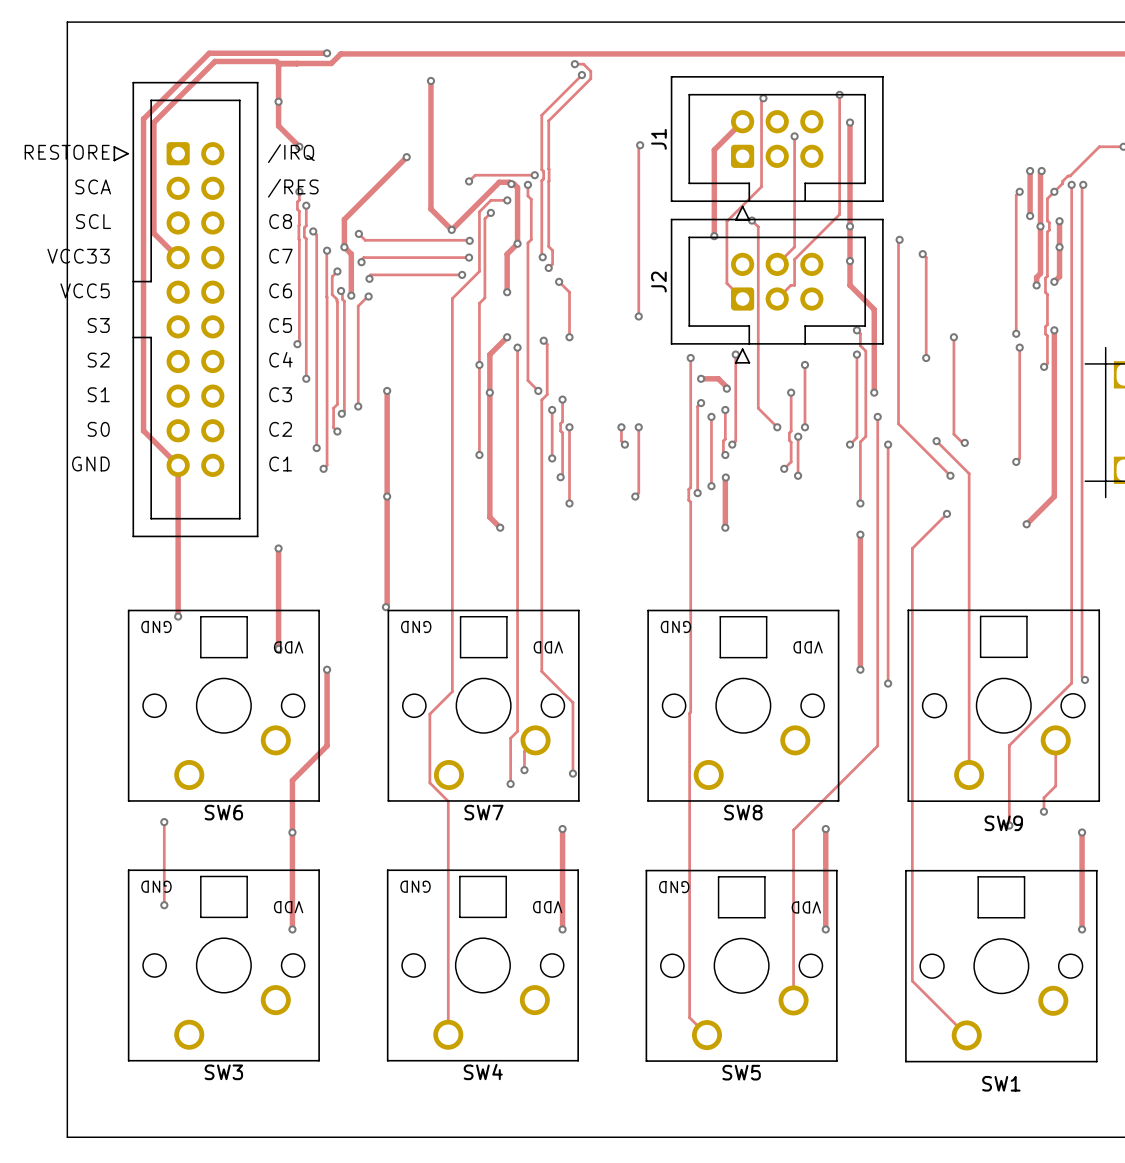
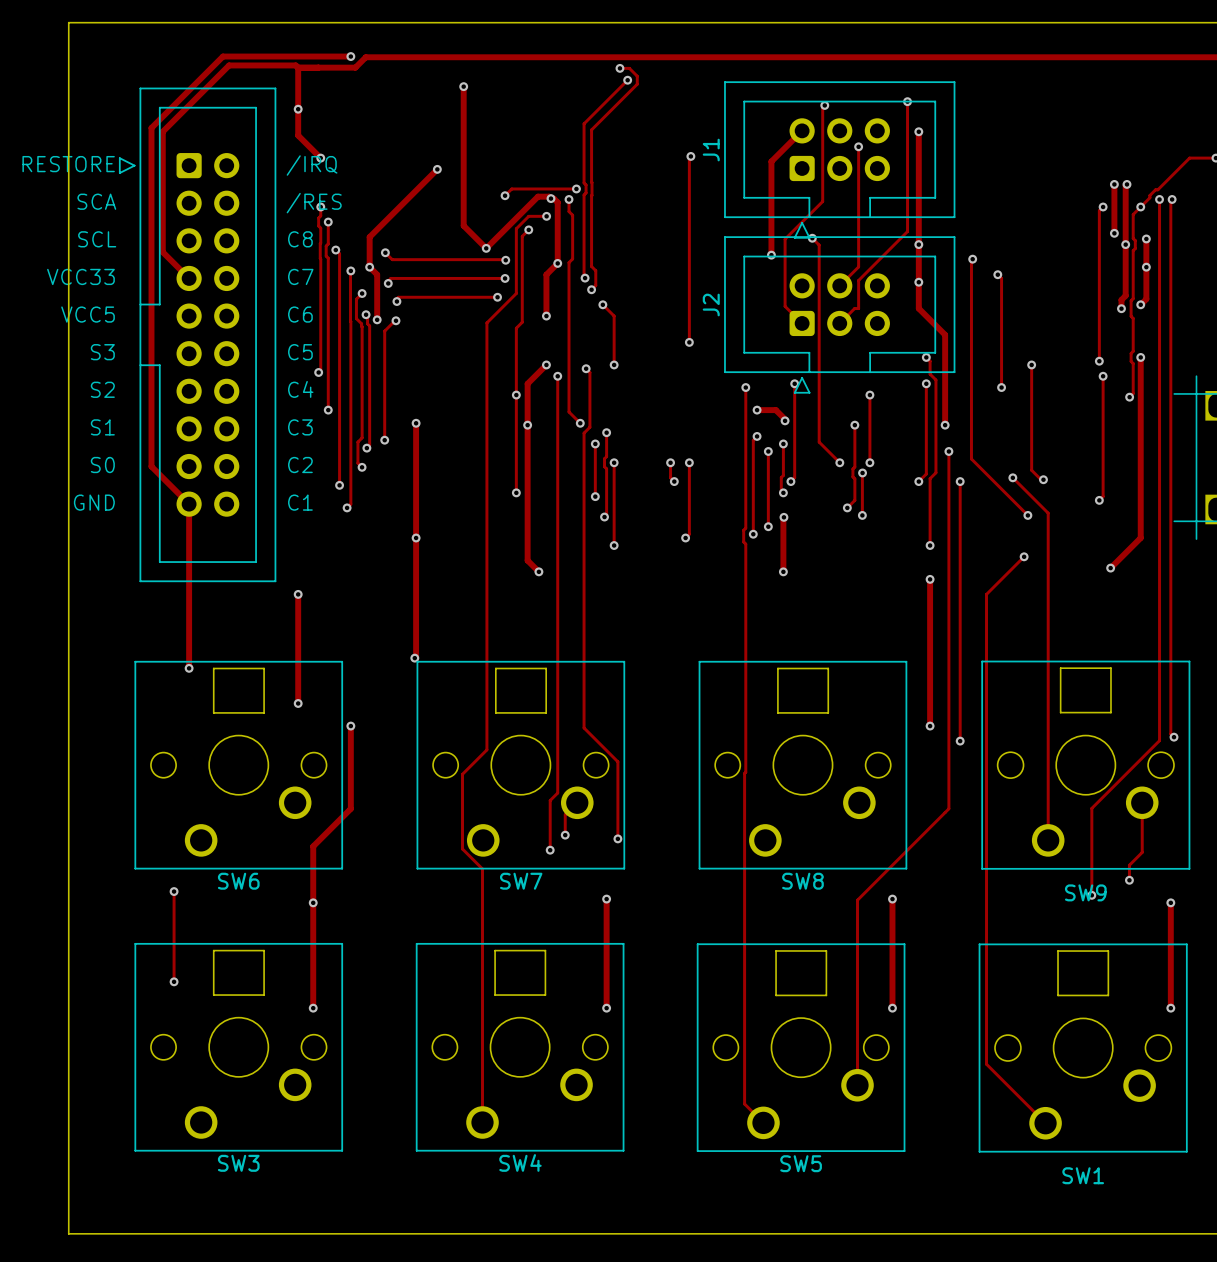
SW6 text: GND (156, 626) -> none
SW7 text: GND (416, 626) -> none
SW8 text: GND (675, 626) -> none
SW6 text: VDD (288, 647) -> none
SW7 text: VDD (548, 647) -> none
SW8 text: VDD (808, 647) -> none
SW3 text: GND (156, 886) -> none
SW4 text: GND (415, 886) -> none
SW5 text: GND (674, 887) -> none
SW3 text: VDD (288, 907) -> none
SW4 text: VDD (547, 907) -> none
SW5 text: VDD (806, 907) -> none

